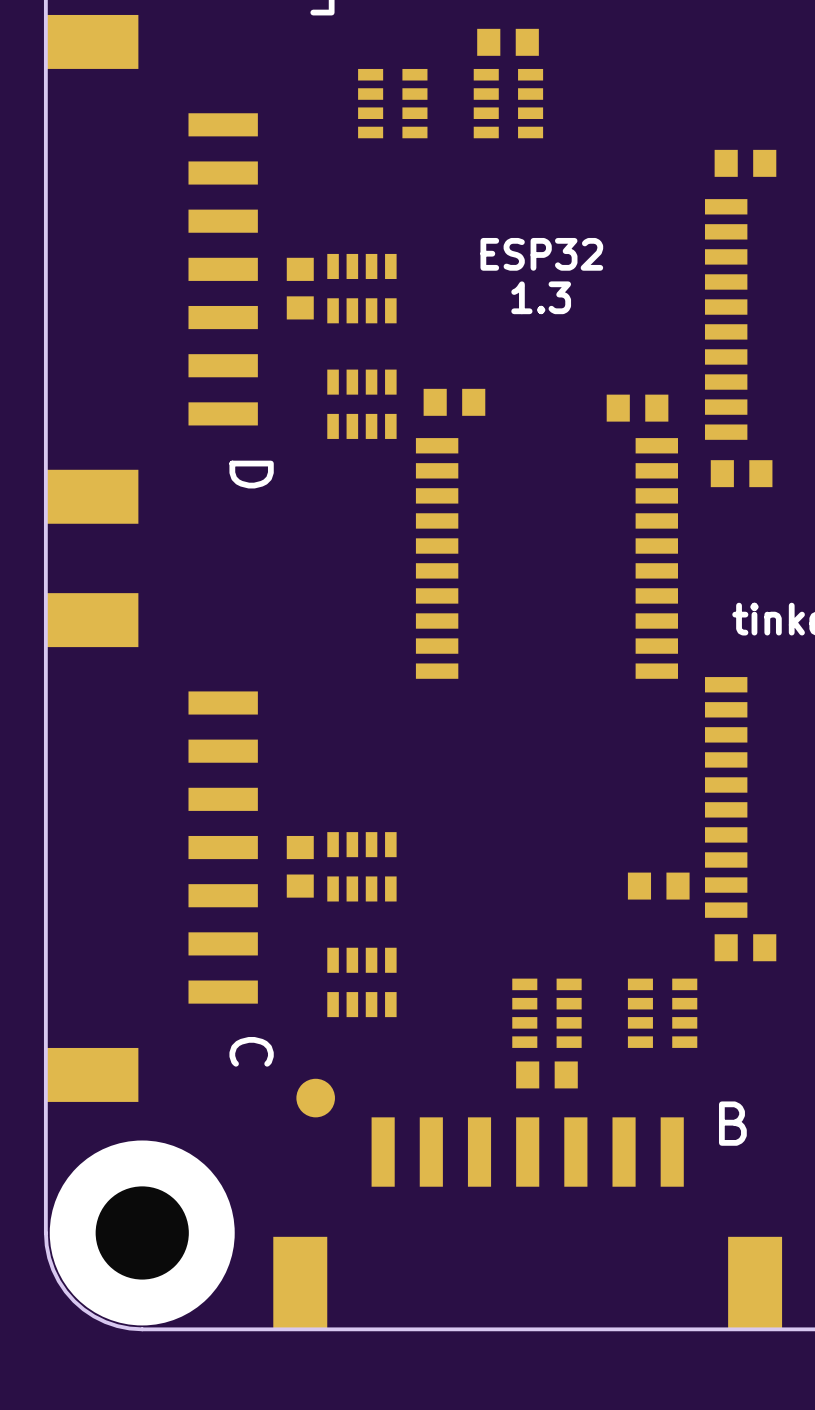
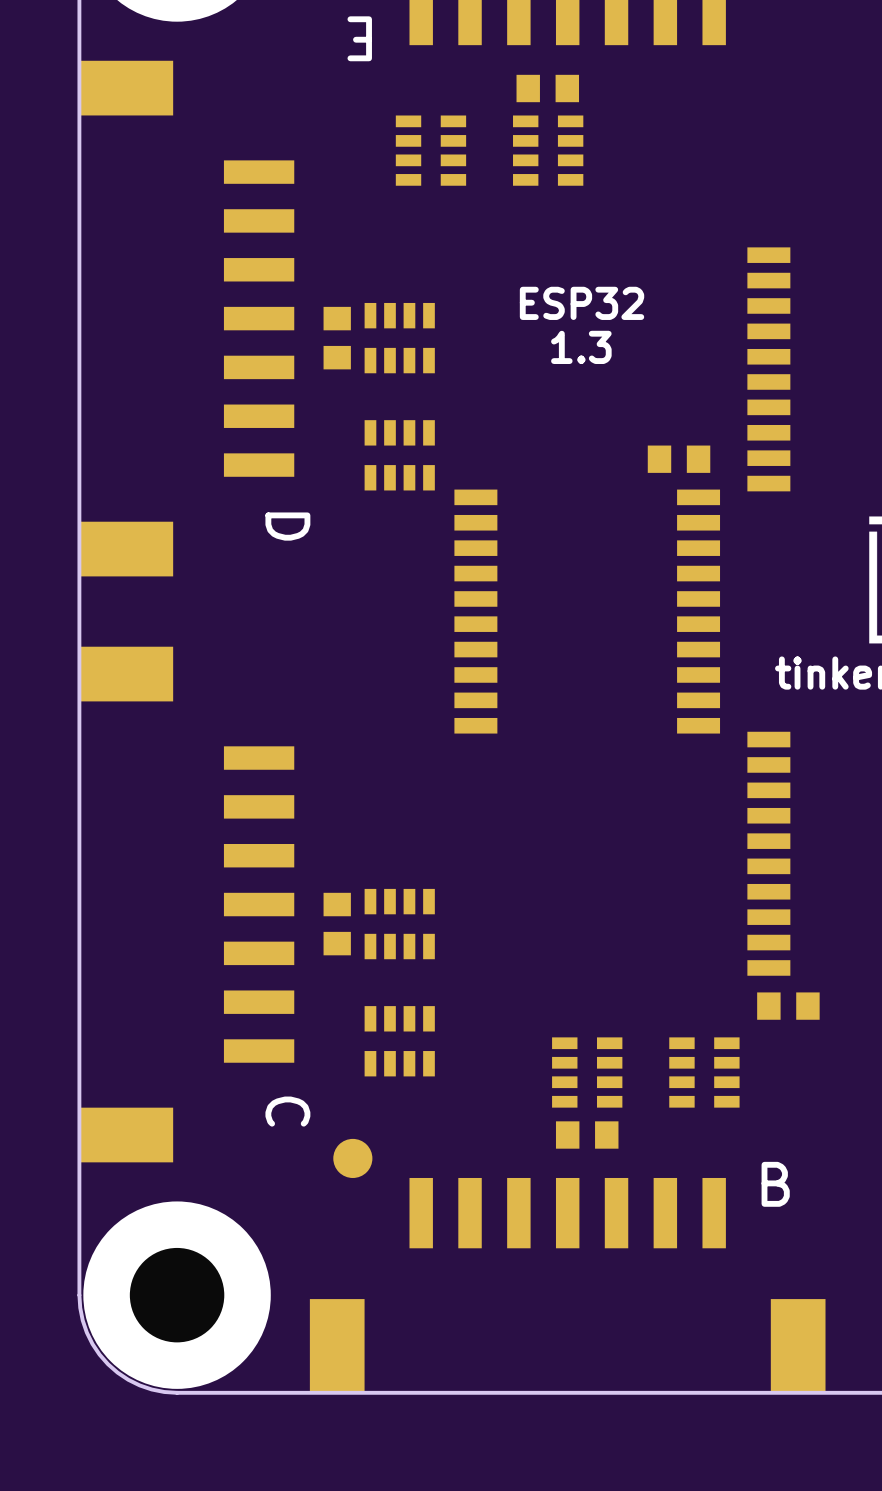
part: (745, 163) -> none
part: (454, 402) -> none
part: (741, 473) -> none
part: (658, 886) -> none

